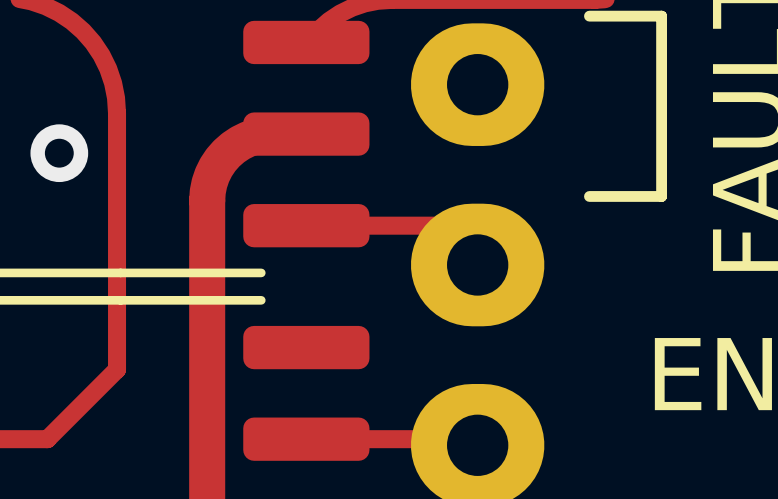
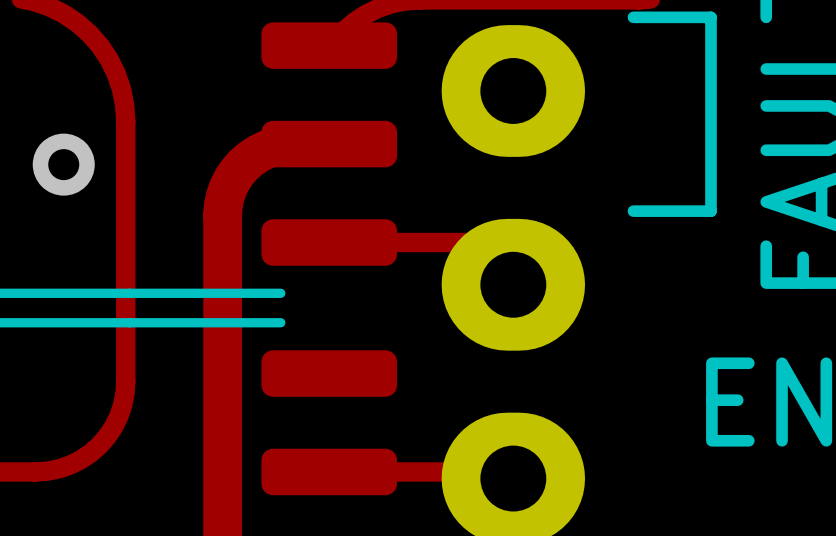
track: (117, 355) (117, 369) (47, 439) (32, 439) -> (125, 381) (124, 393) (118, 416) (107, 436) (99, 445) (90, 453) (70, 465) (58, 468) (35, 471)

